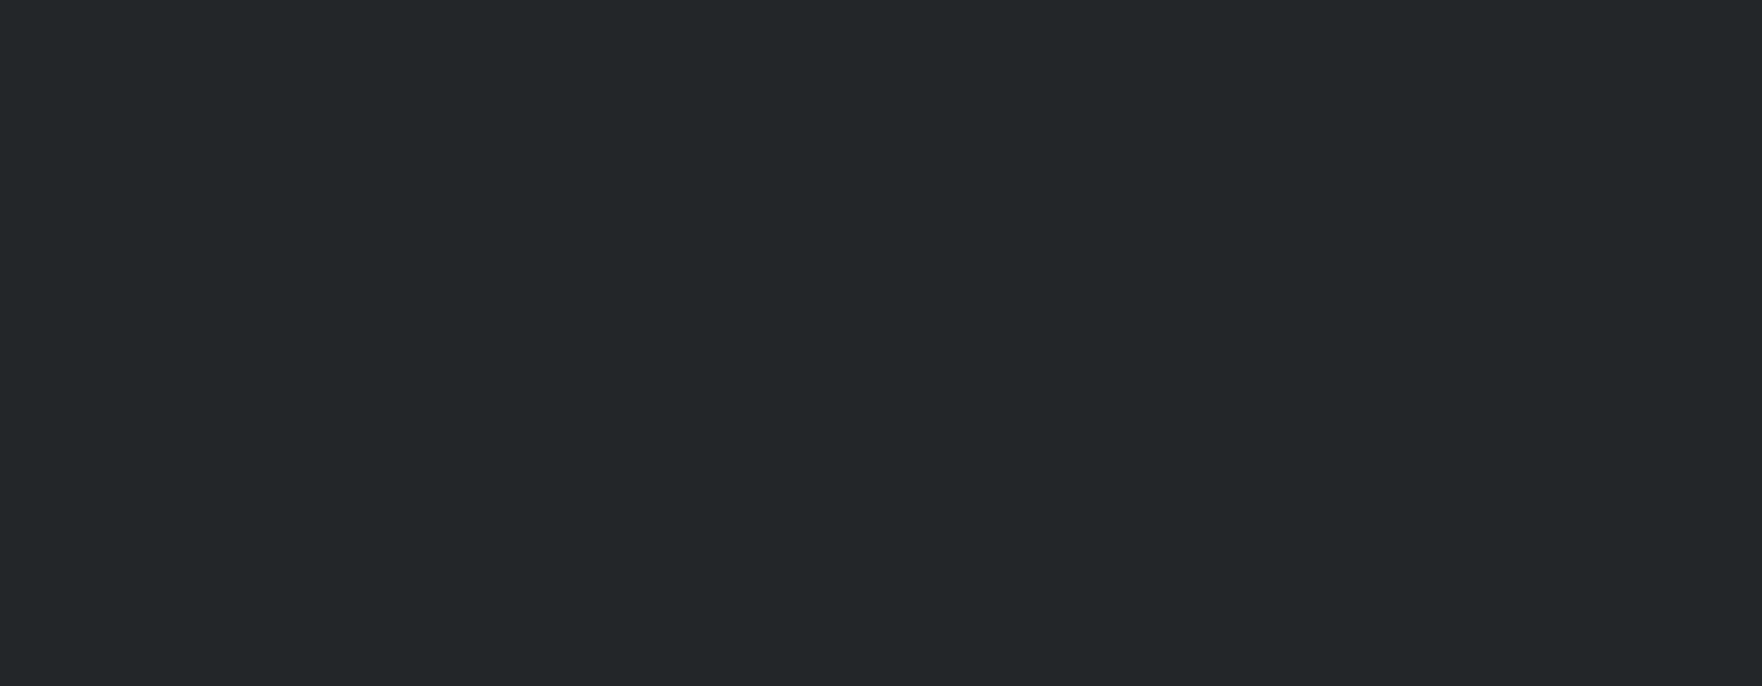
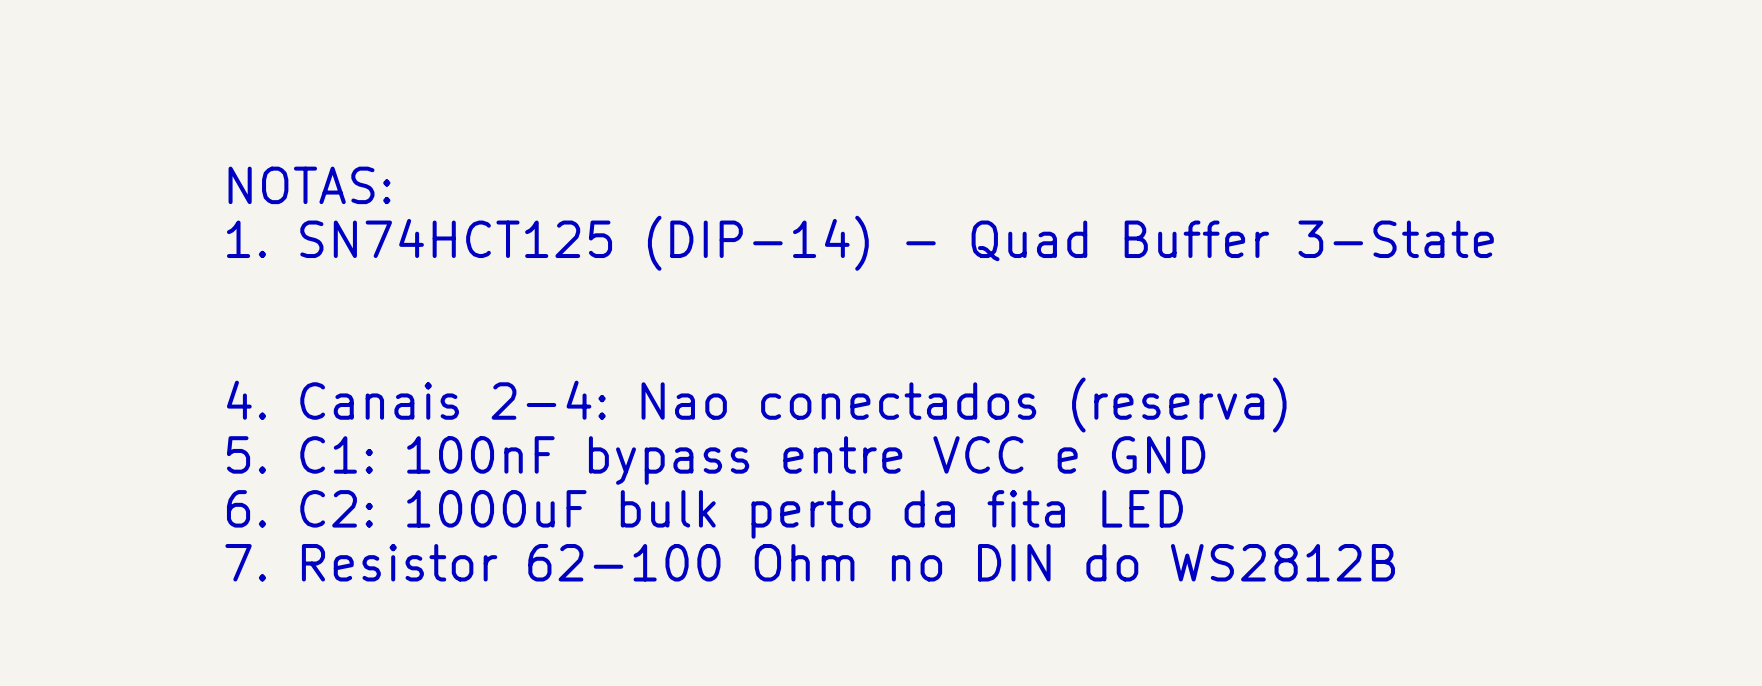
text: none -> NOTAS: (309, 185)
text: none -> 1. SN74HCT125 (DIP-14) - Quad Buffer 3-State (860, 243)
text: none -> 4. Canais 2-4: Nao conectados (reserva) (756, 405)
text: none -> 5. C1: 100nF bypass entre VCC e GND (716, 460)
text: none -> 6. C2: 1000uF bulk perto da fita LED (704, 514)
text: none -> 7. Resistor 62-100 Ohm no DIN do WS2812B (810, 562)

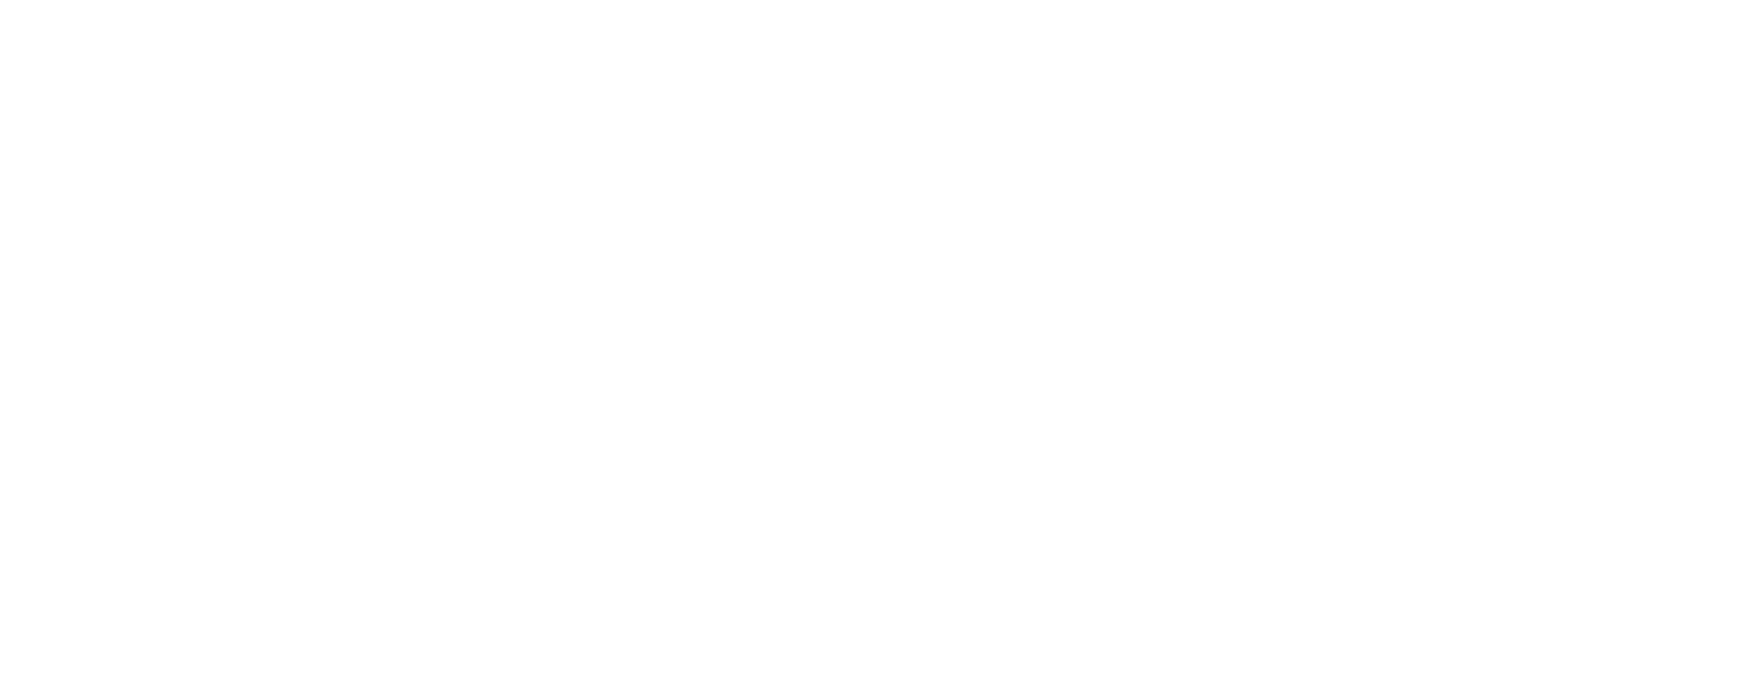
text: NOTAS: (309, 185) -> none
text: 1. SN74HCT125 (DIP-14) - Quad Buffer 3-State (860, 243) -> none
text: 4. Canais 2-4: Nao conectados (reserva) (756, 405) -> none
text: 5. C1: 100nF bypass entre VCC e GND (716, 460) -> none
text: 6. C2: 1000uF bulk perto da fita LED (704, 514) -> none
text: 7. Resistor 62-100 Ohm no DIN do WS2812B (810, 562) -> none

